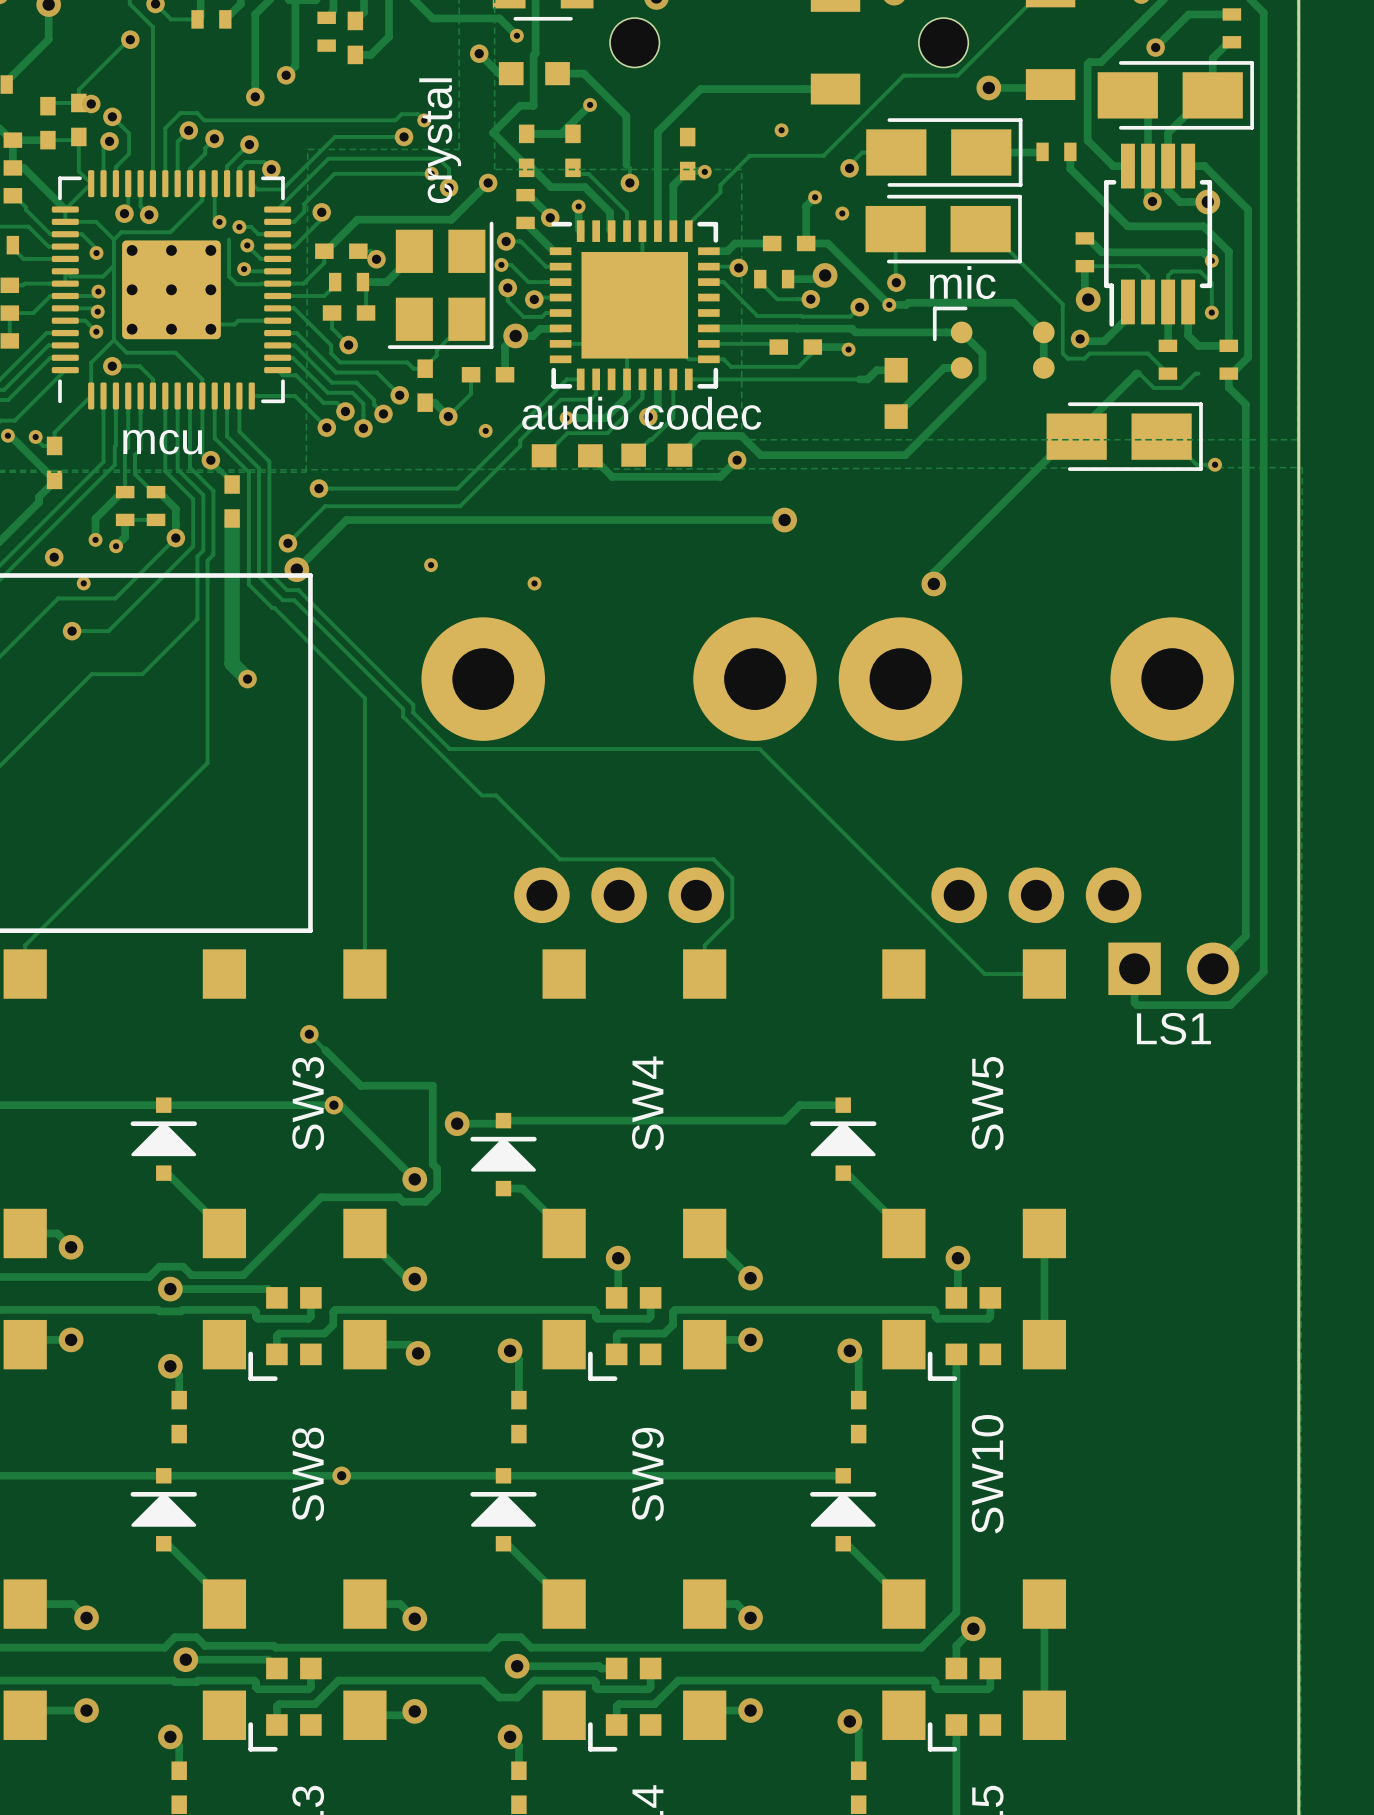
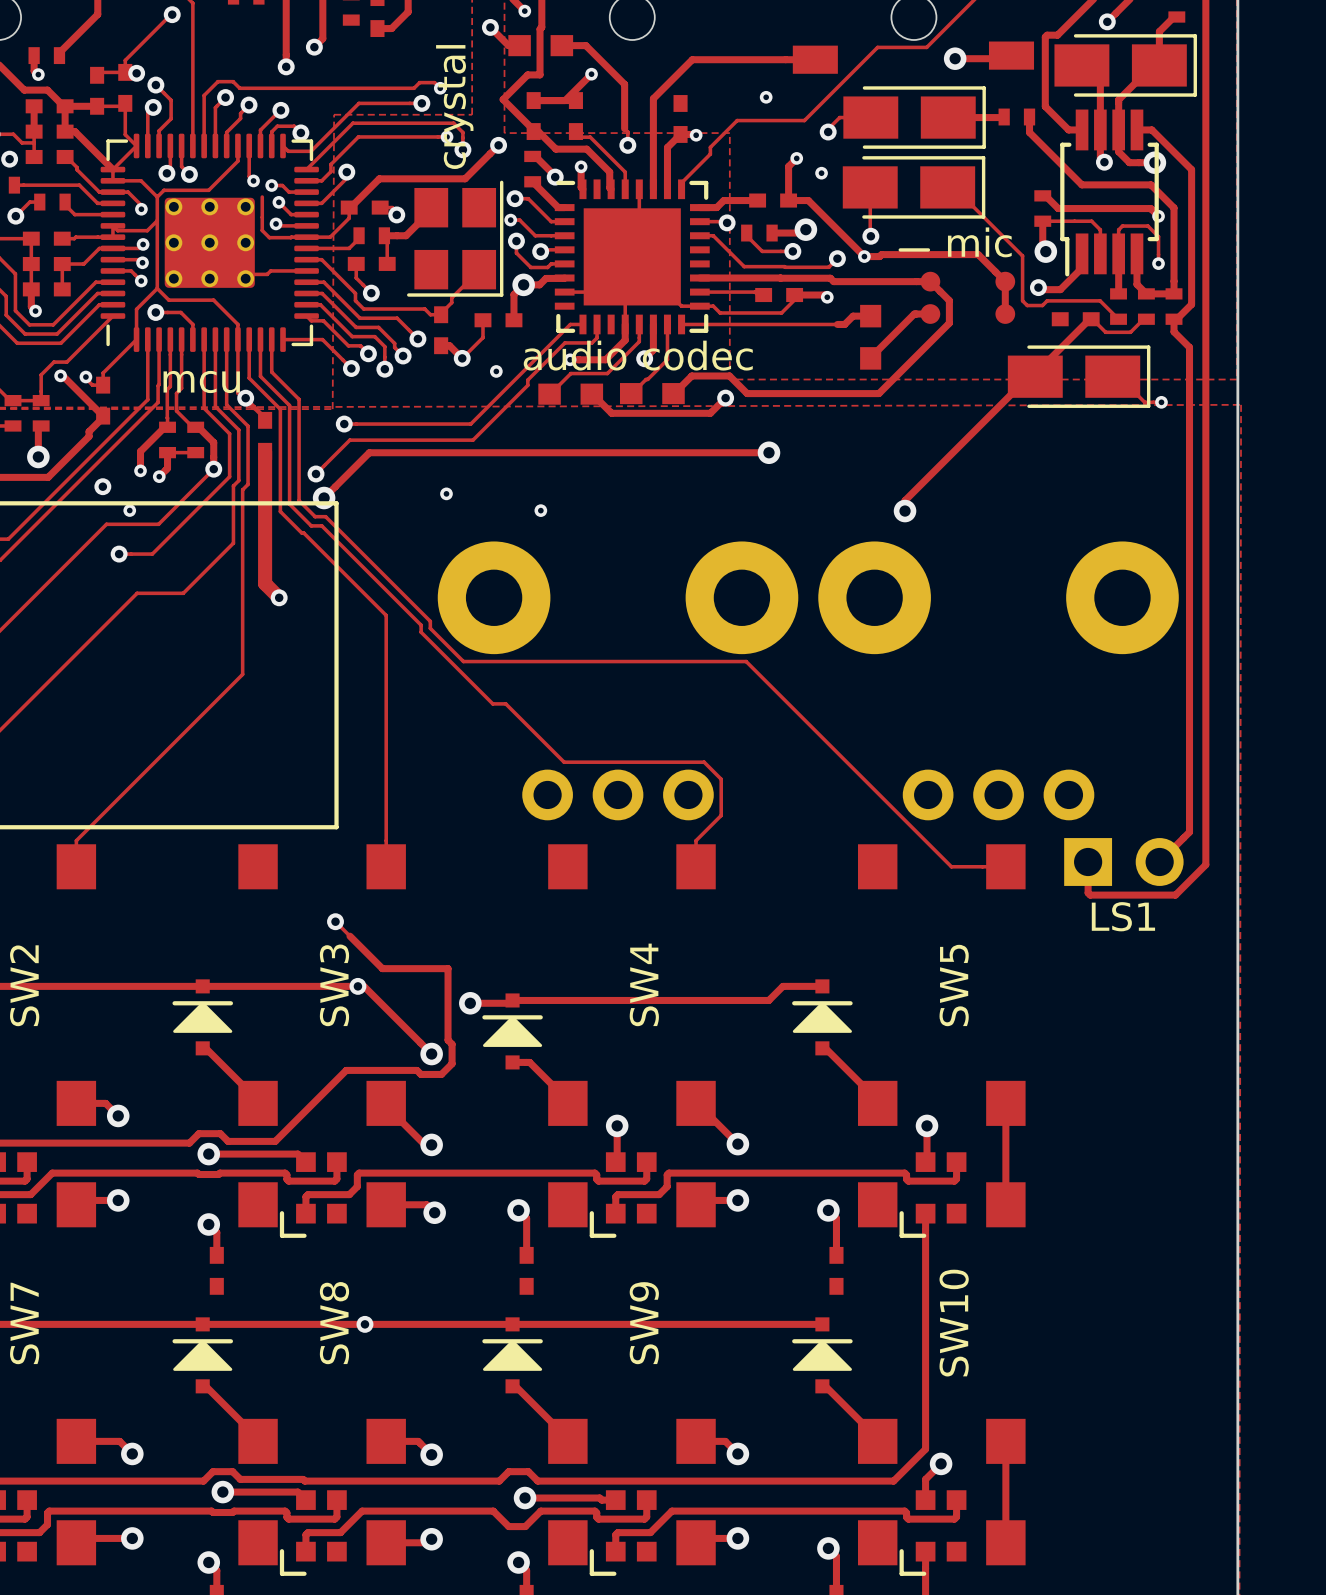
text position: mic (962, 282) -> mic (979, 242)
line: none -> (900, 249) (928, 249)
line: (965, 308) (934, 308) (934, 339) -> none
part: none -> (1146, 306)
part: none -> (1075, 319)

